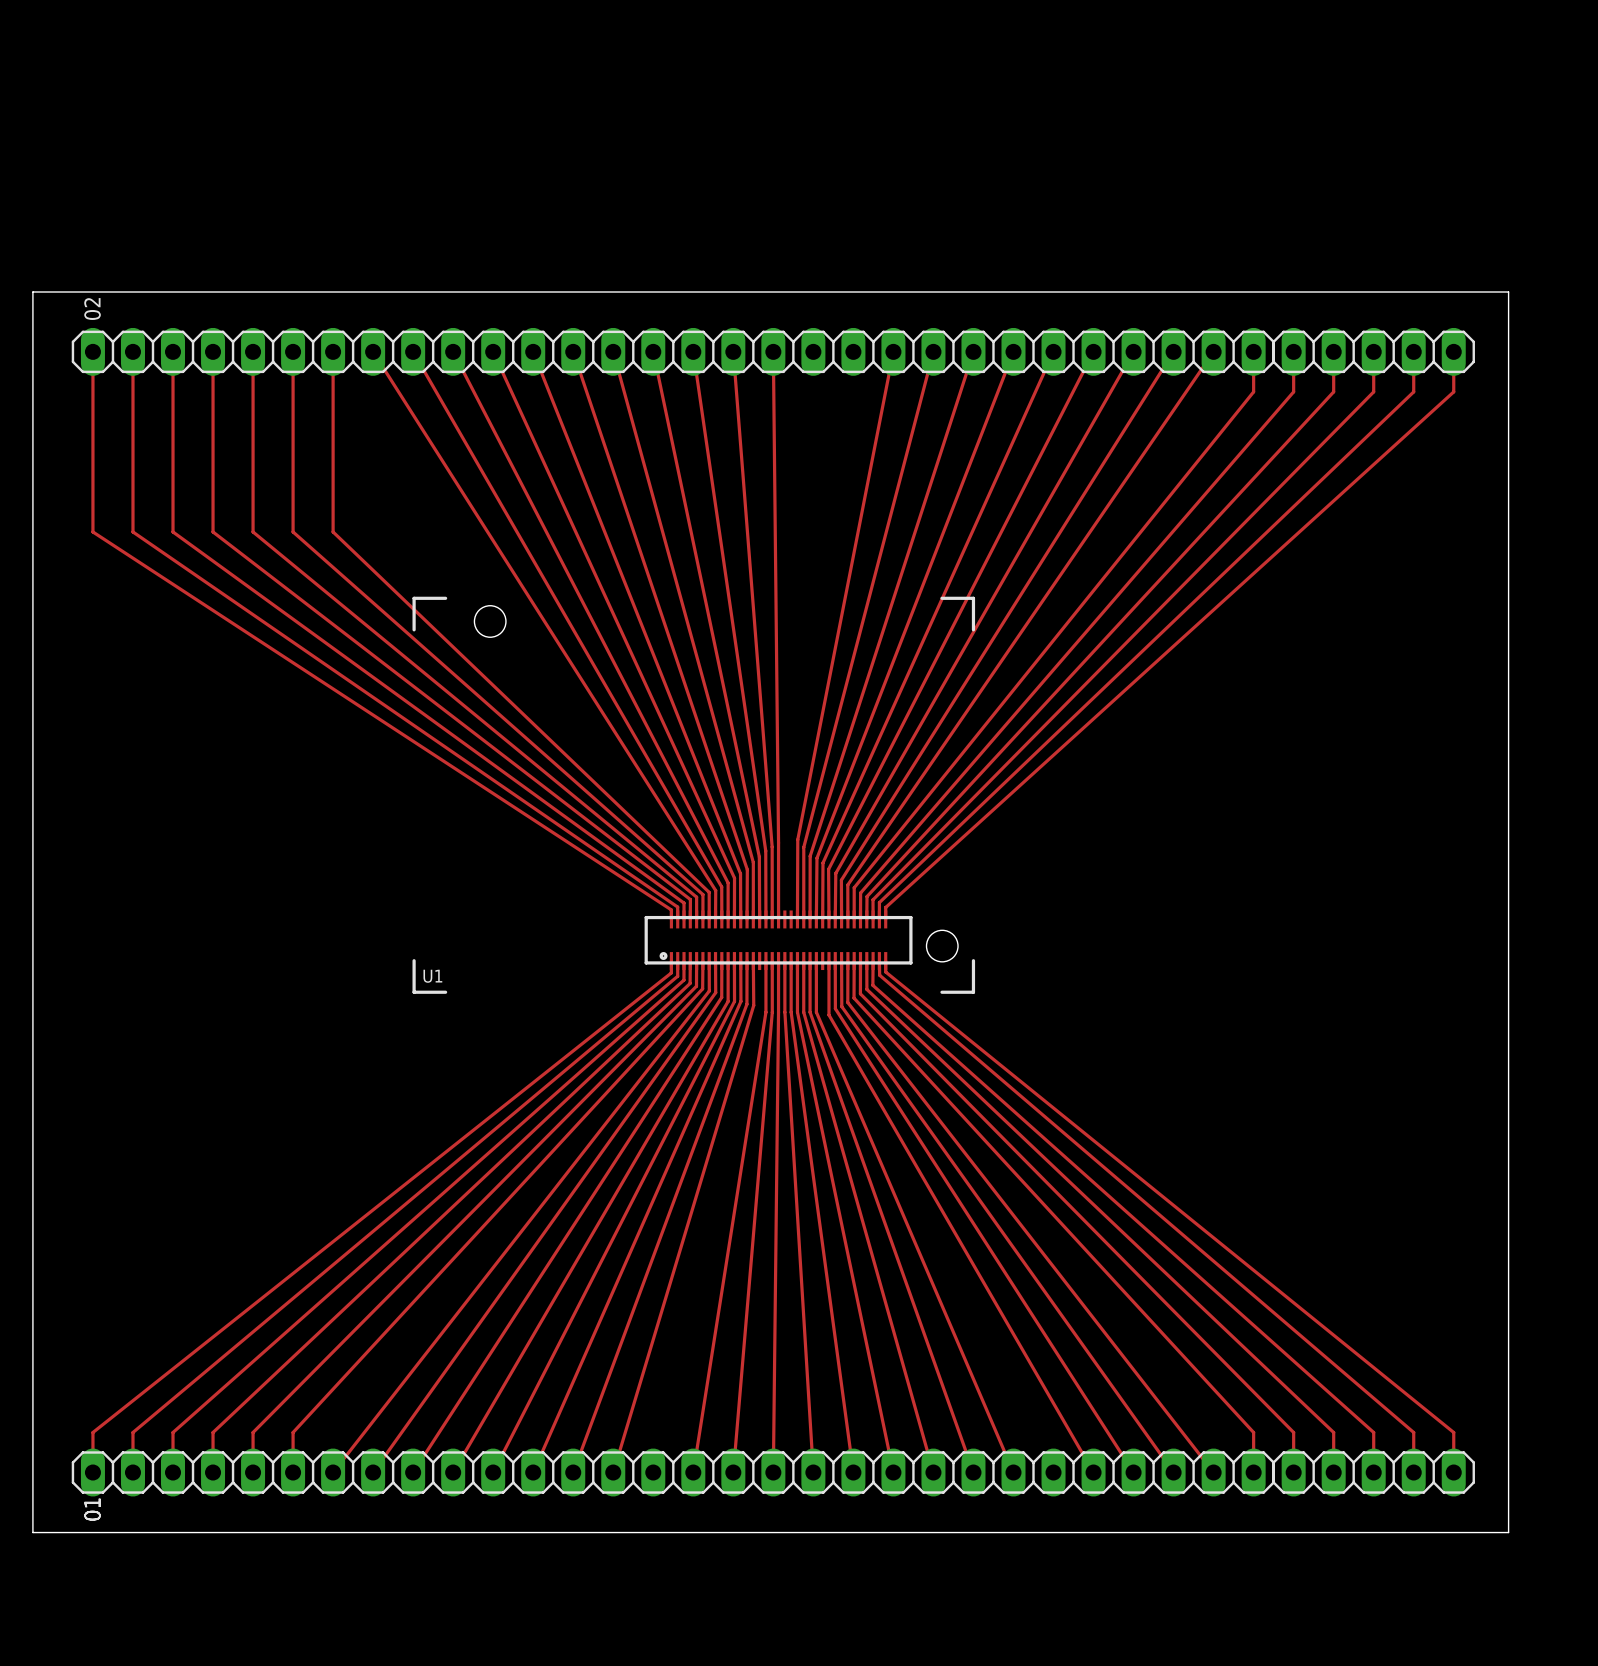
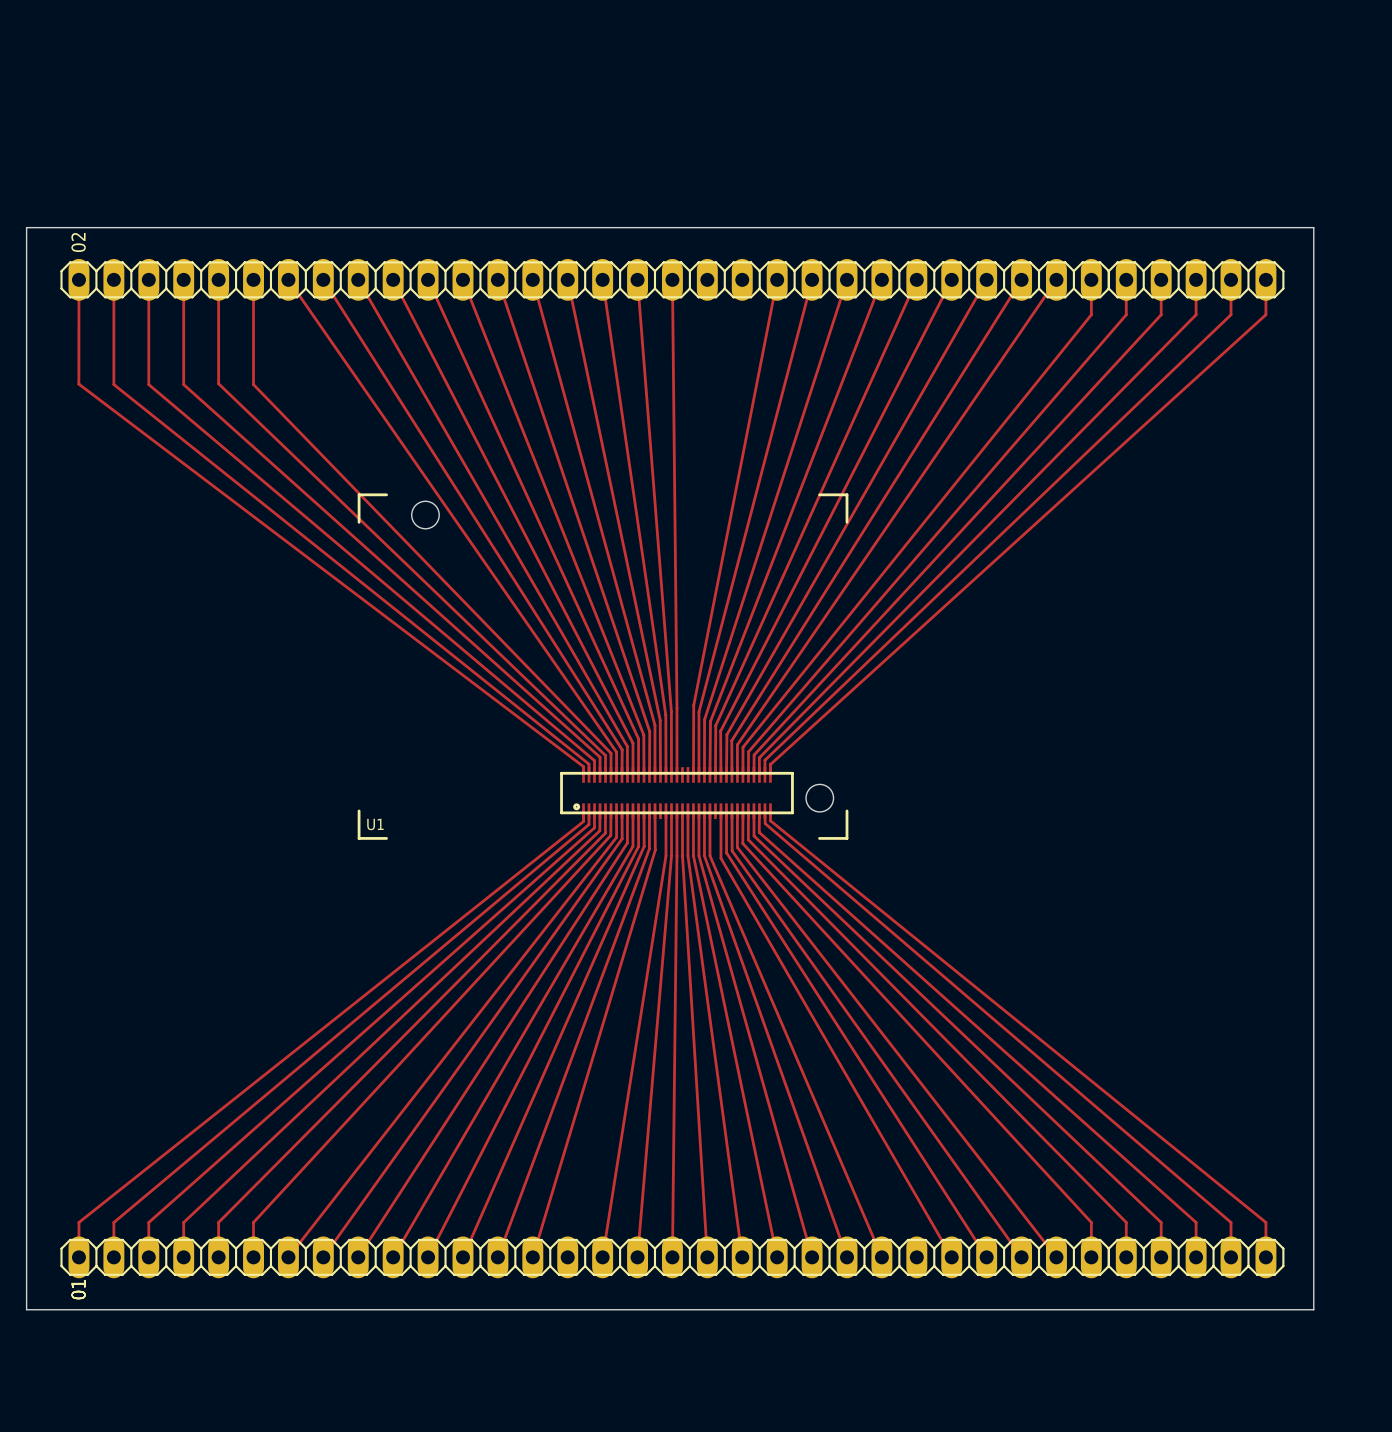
track: (92, 351) (92, 531) (671, 909) -> (78, 279) (78, 384) (583, 766)
track: (333, 351) (333, 531) (709, 892) (709, 919) -> (288, 279) (616, 752) (616, 774)
track: (253, 470) (253, 531) (696, 897) -> (218, 383) (605, 755)
track: (132, 471) (132, 531) (677, 907) -> (113, 384) (588, 764)
track: (173, 471) (173, 531) (684, 903) -> (148, 384) (594, 760)
track: (213, 471) (213, 531) (690, 899) -> (183, 384) (600, 757)
track: (293, 471) (293, 531) (702, 894) -> (253, 384) (611, 753)

